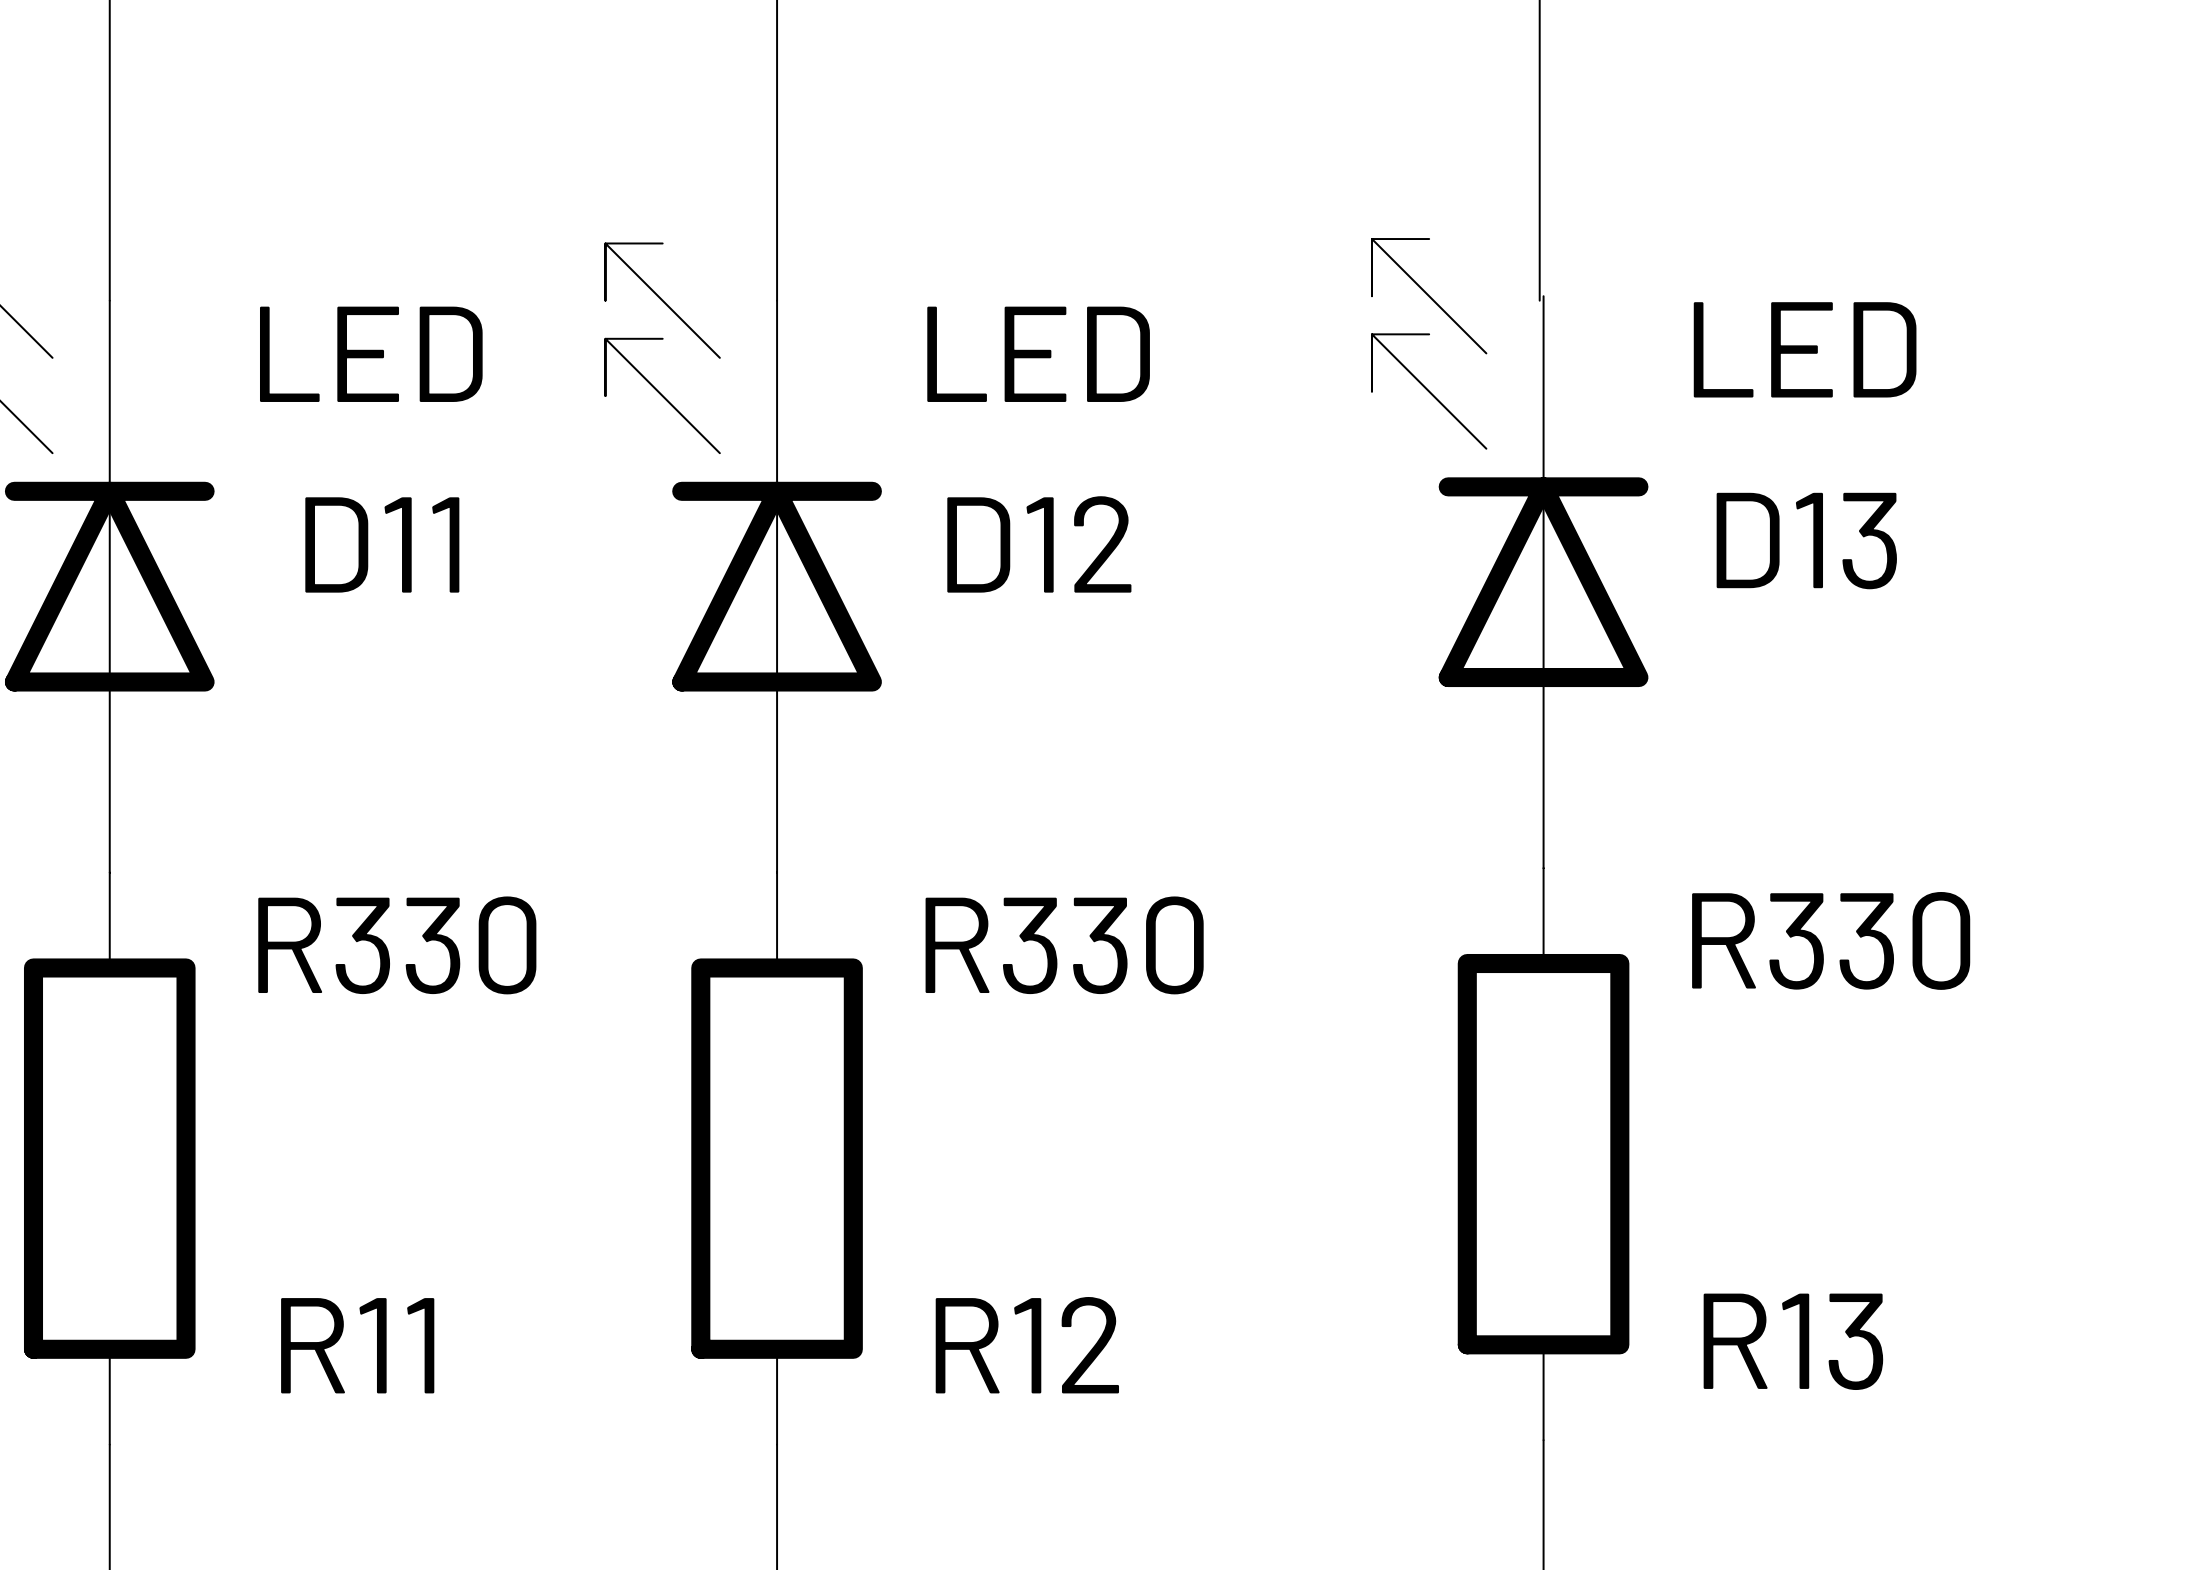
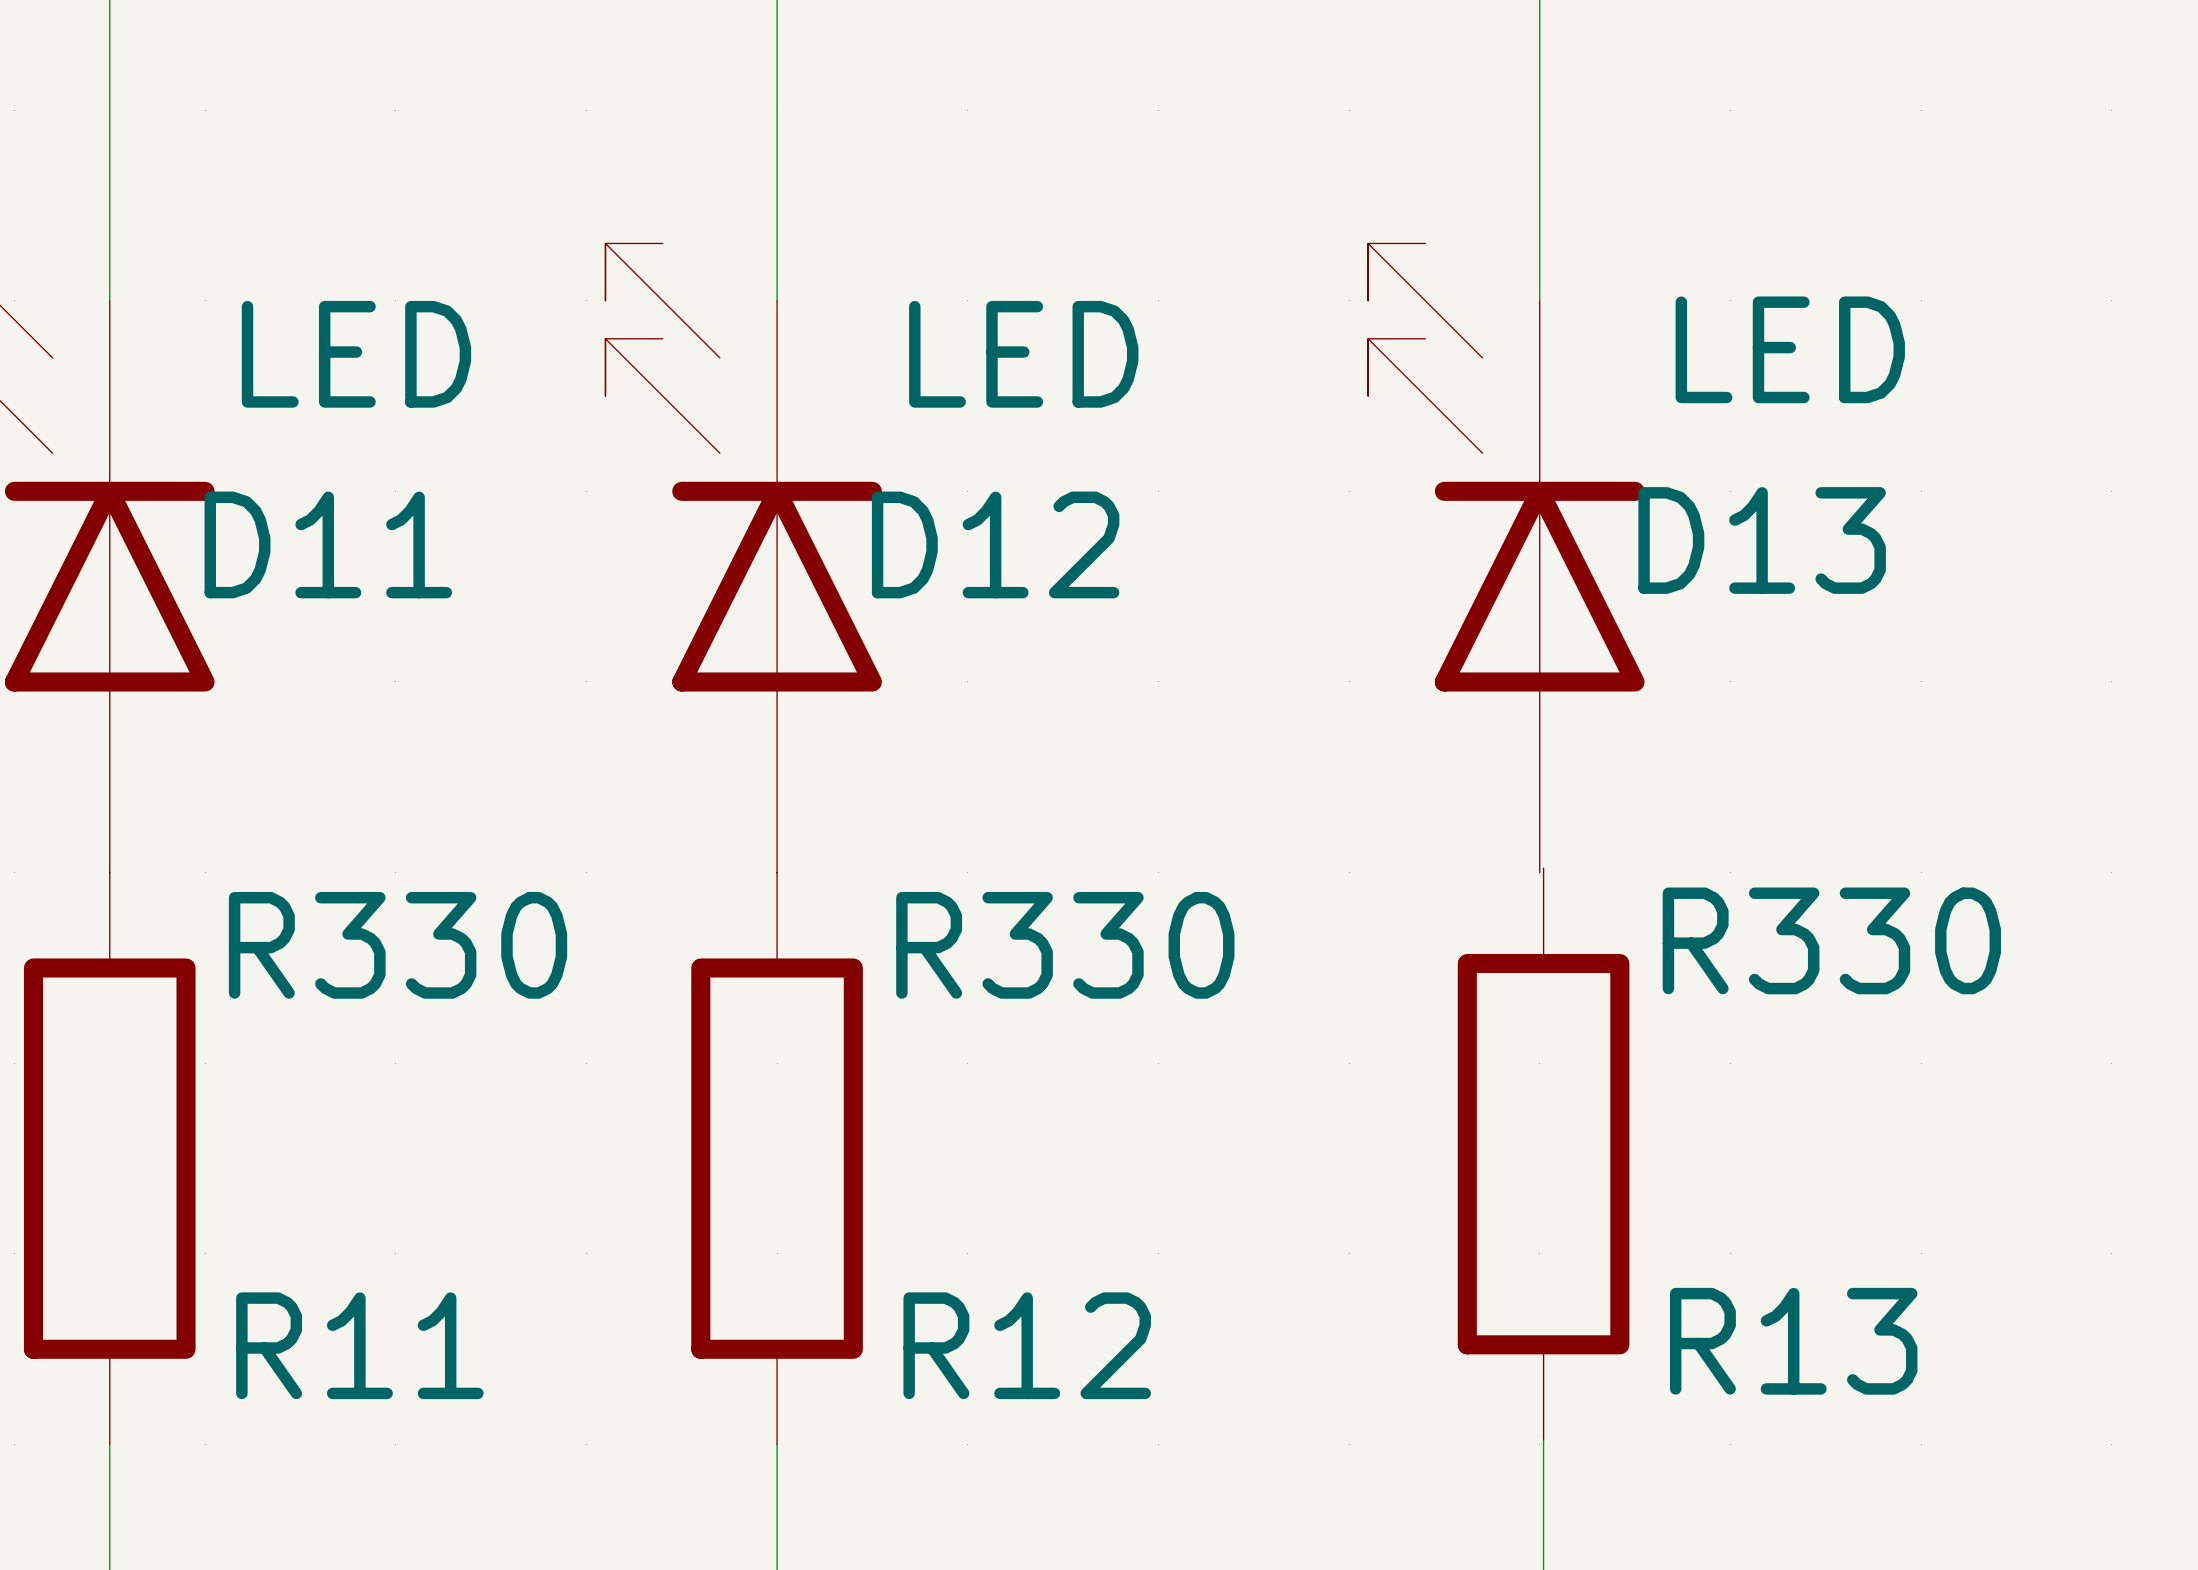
D13 symbol: [1371, 239, 1649, 869] -> [1368, 243, 1645, 873]

